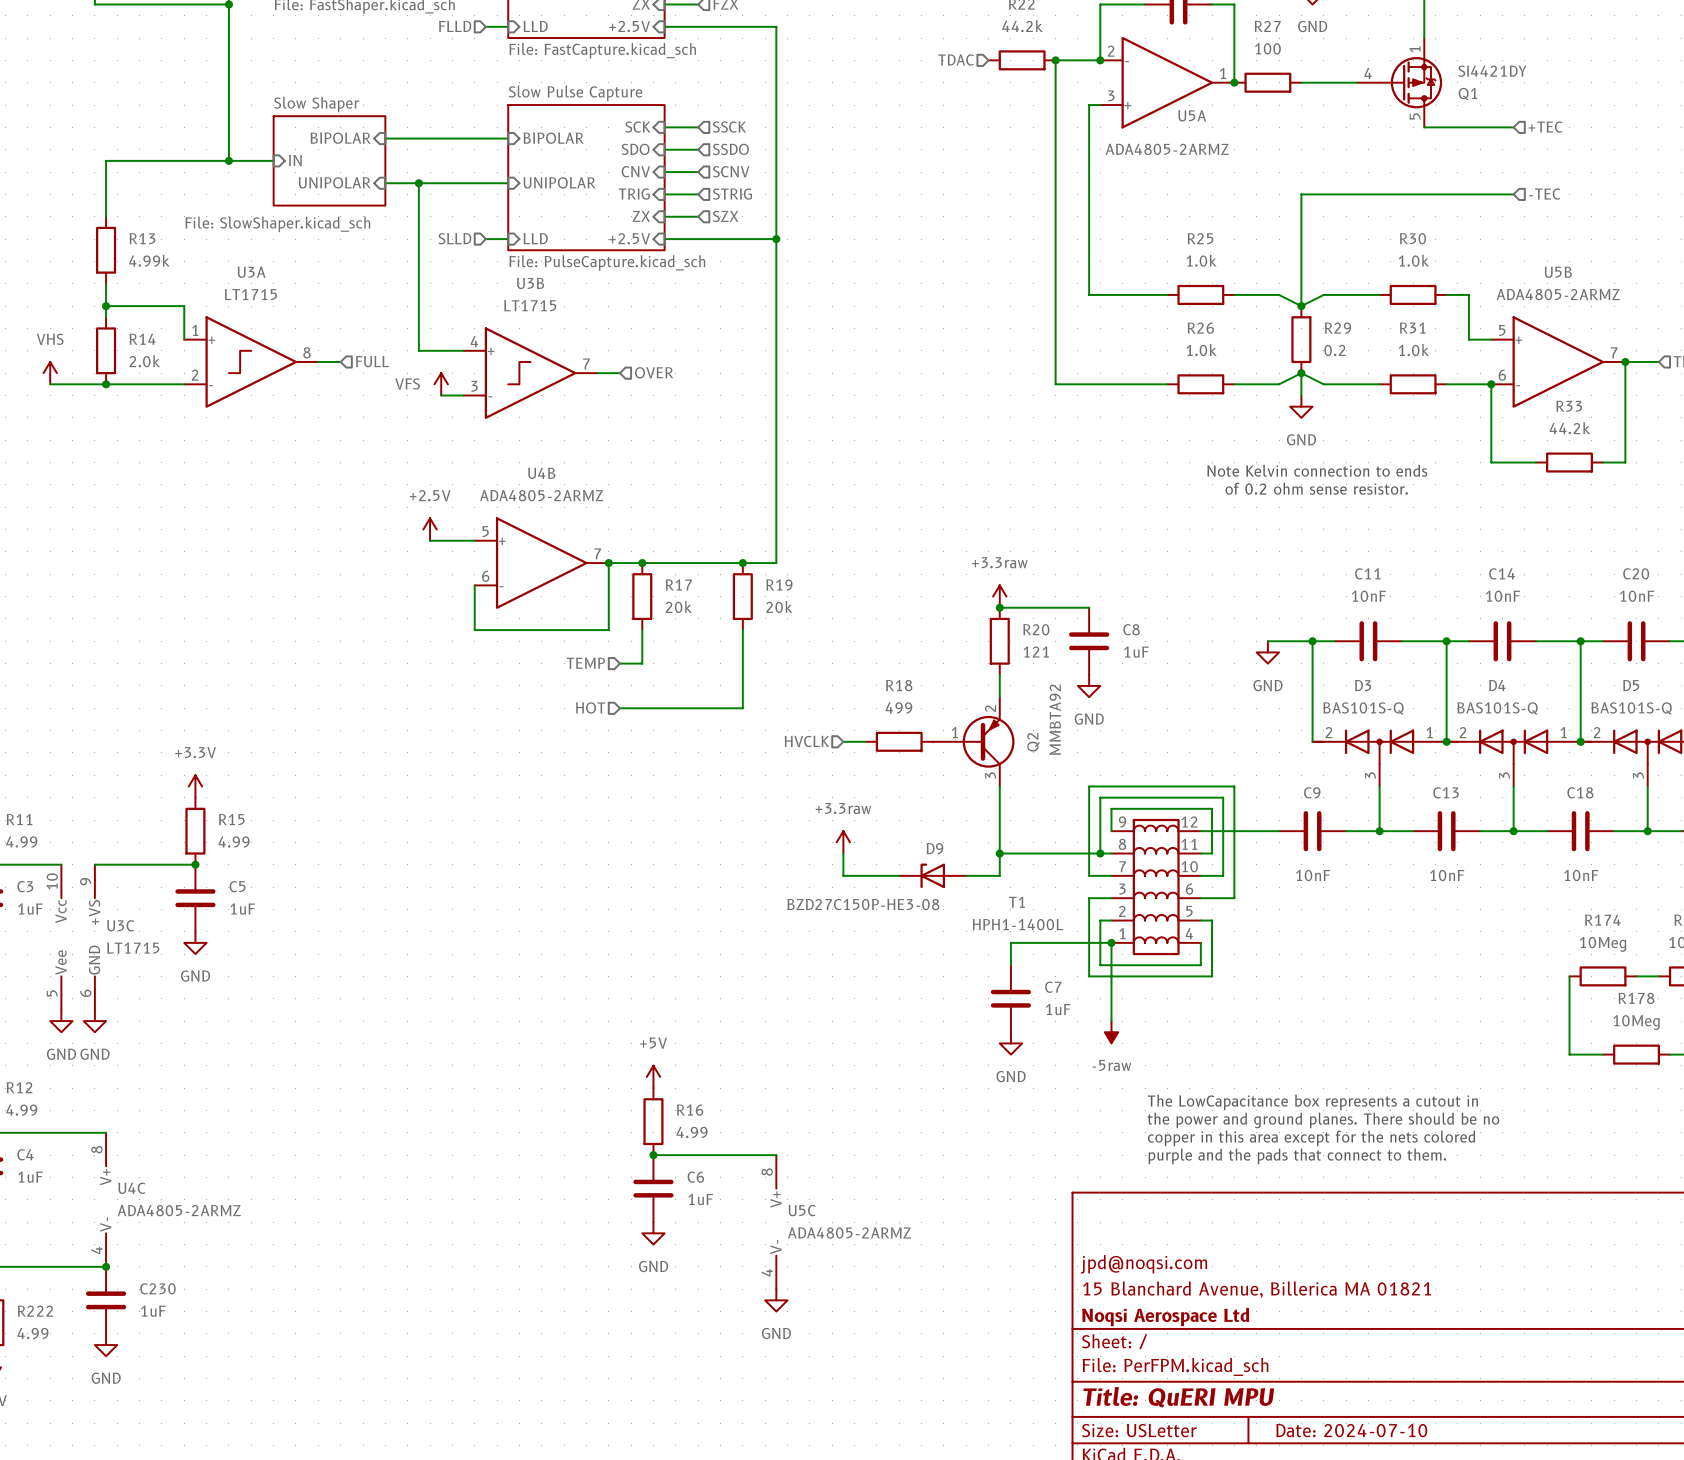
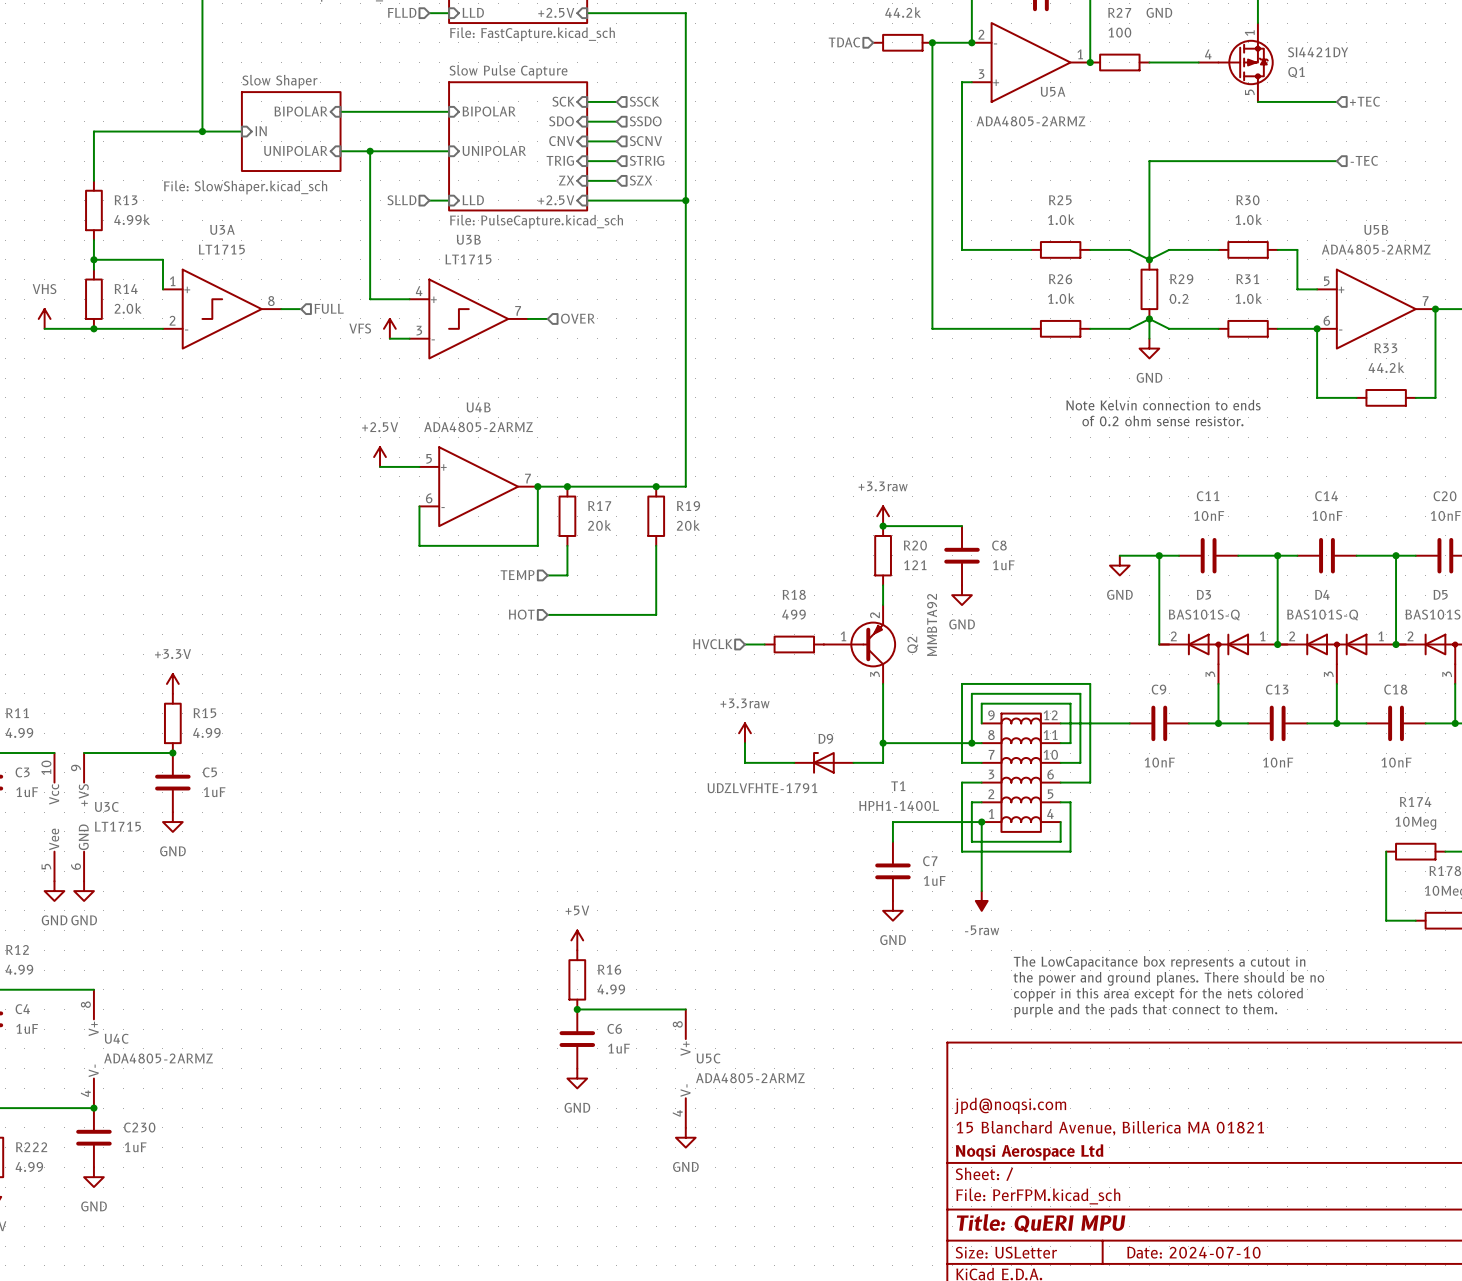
D9 value: BZD27C150P-HE3-08 (863, 904) -> UDZLVFHTE-1791 (762, 788)

